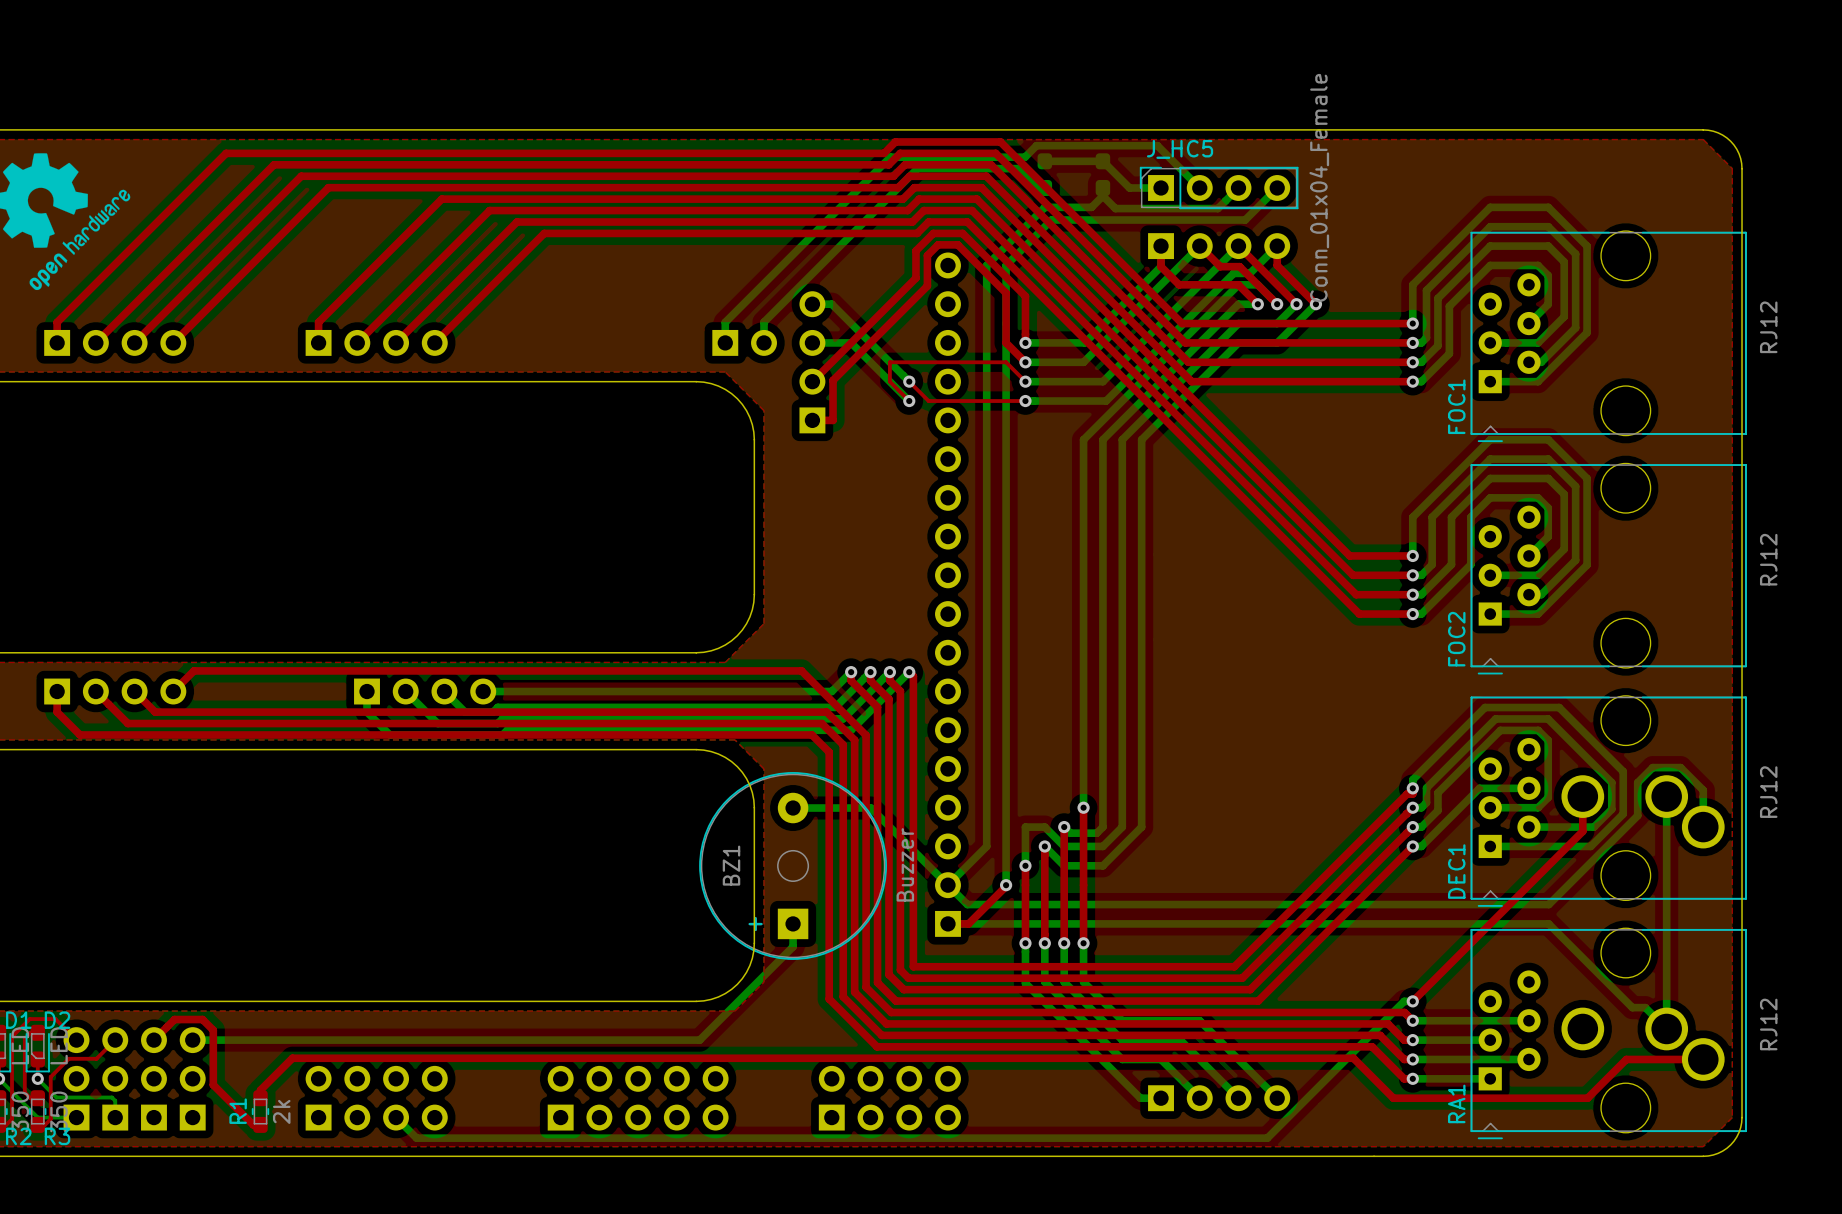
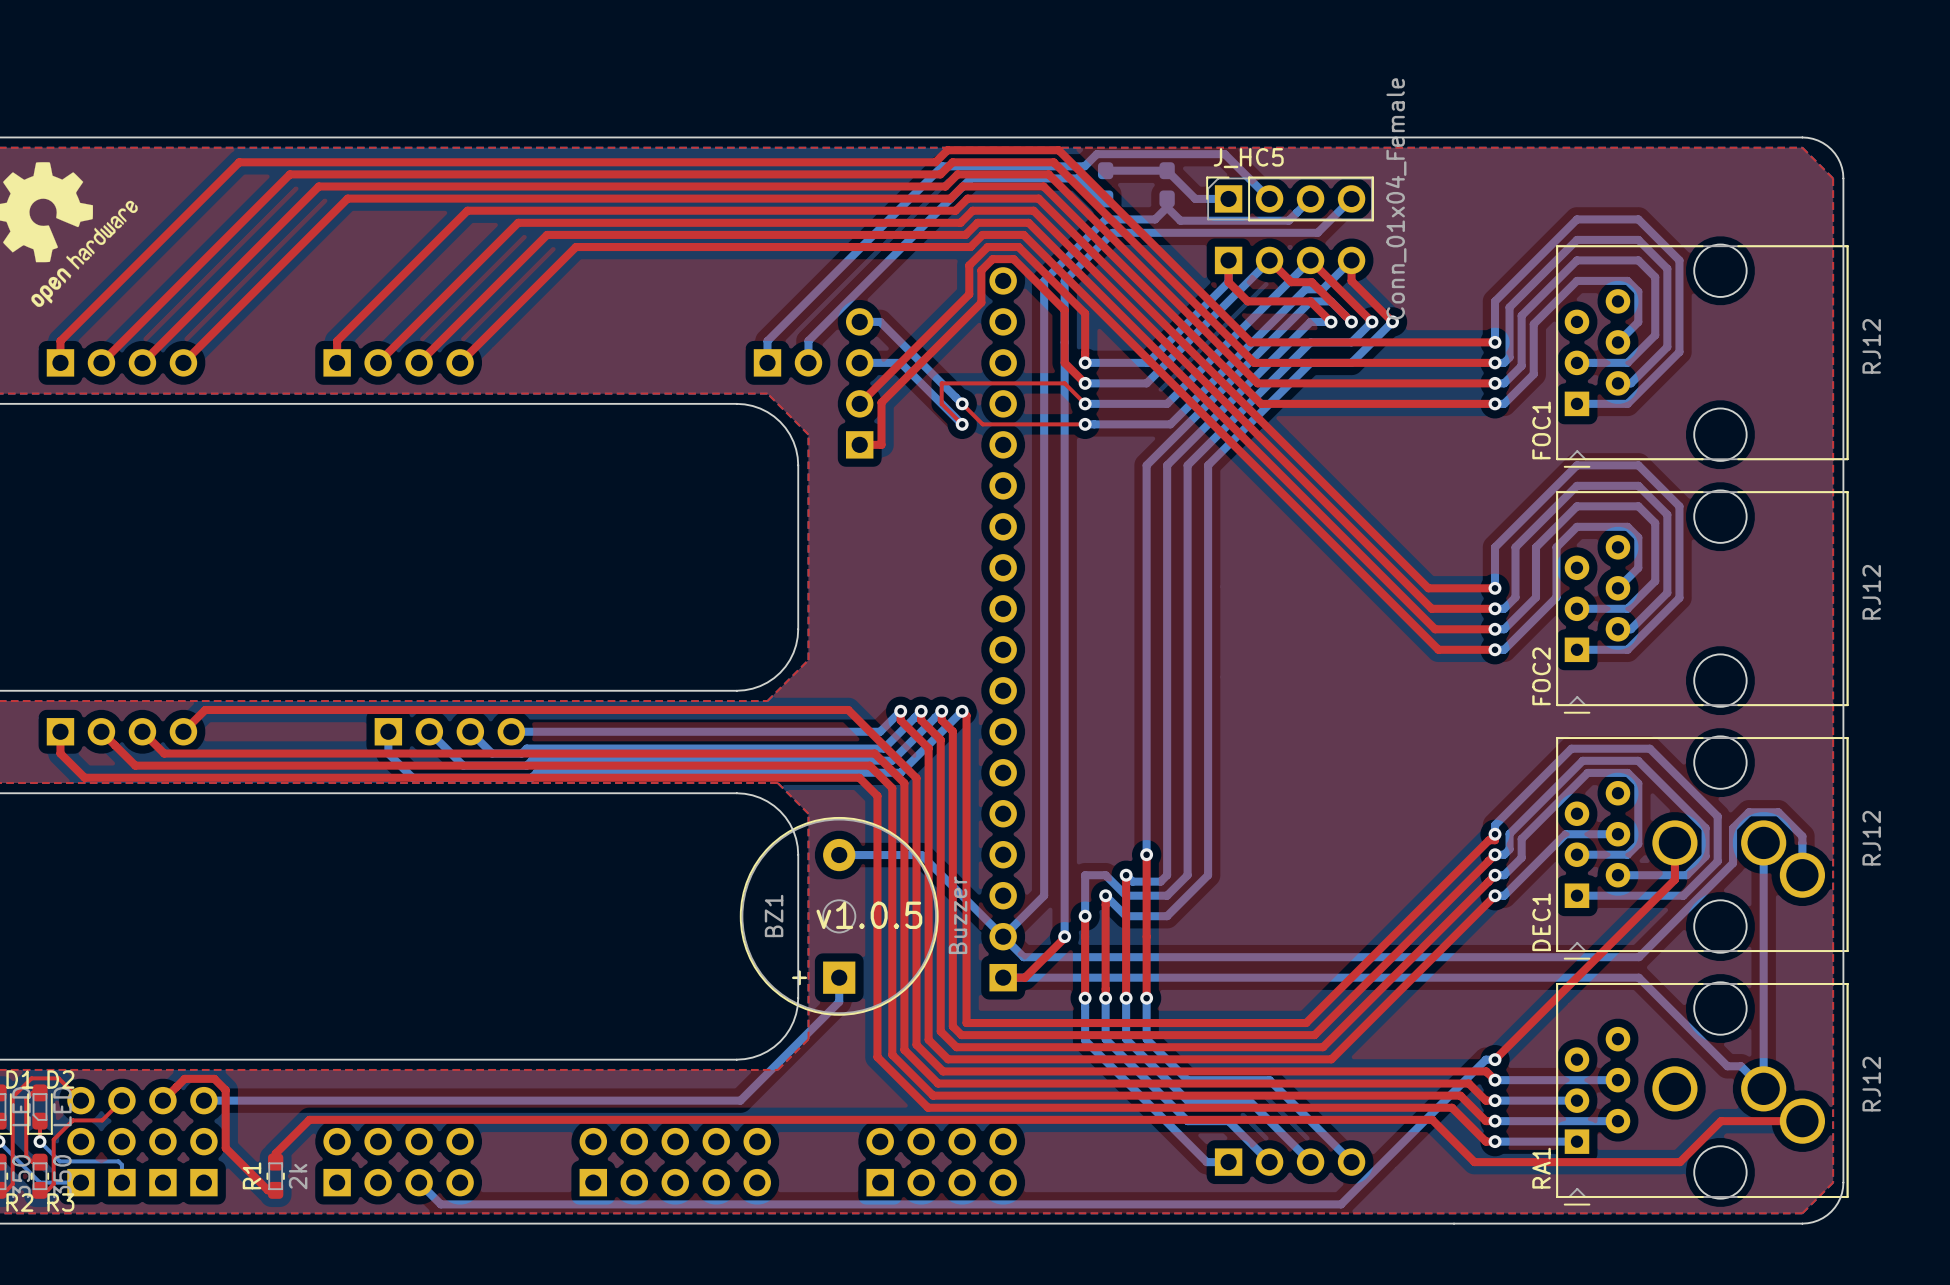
text: none -> v1.0.5 (869, 915)

